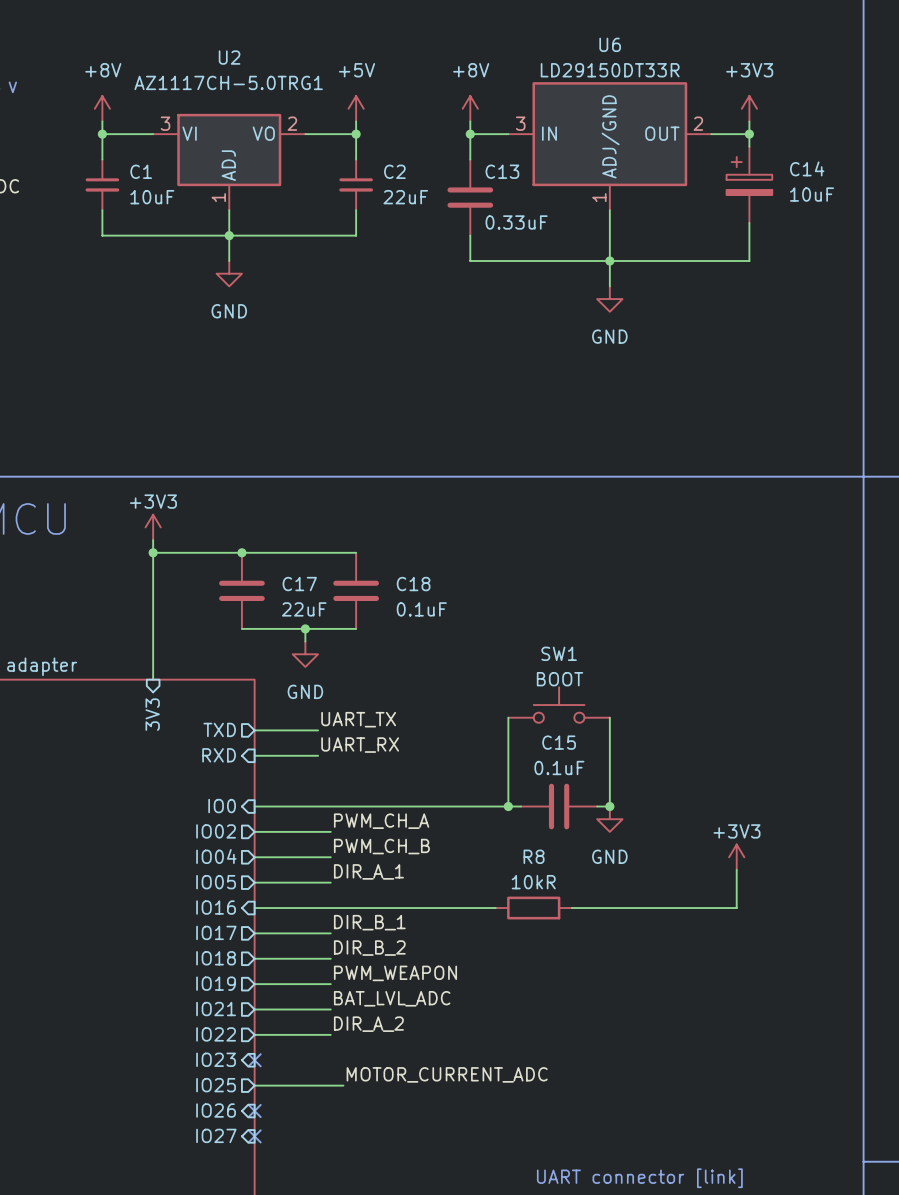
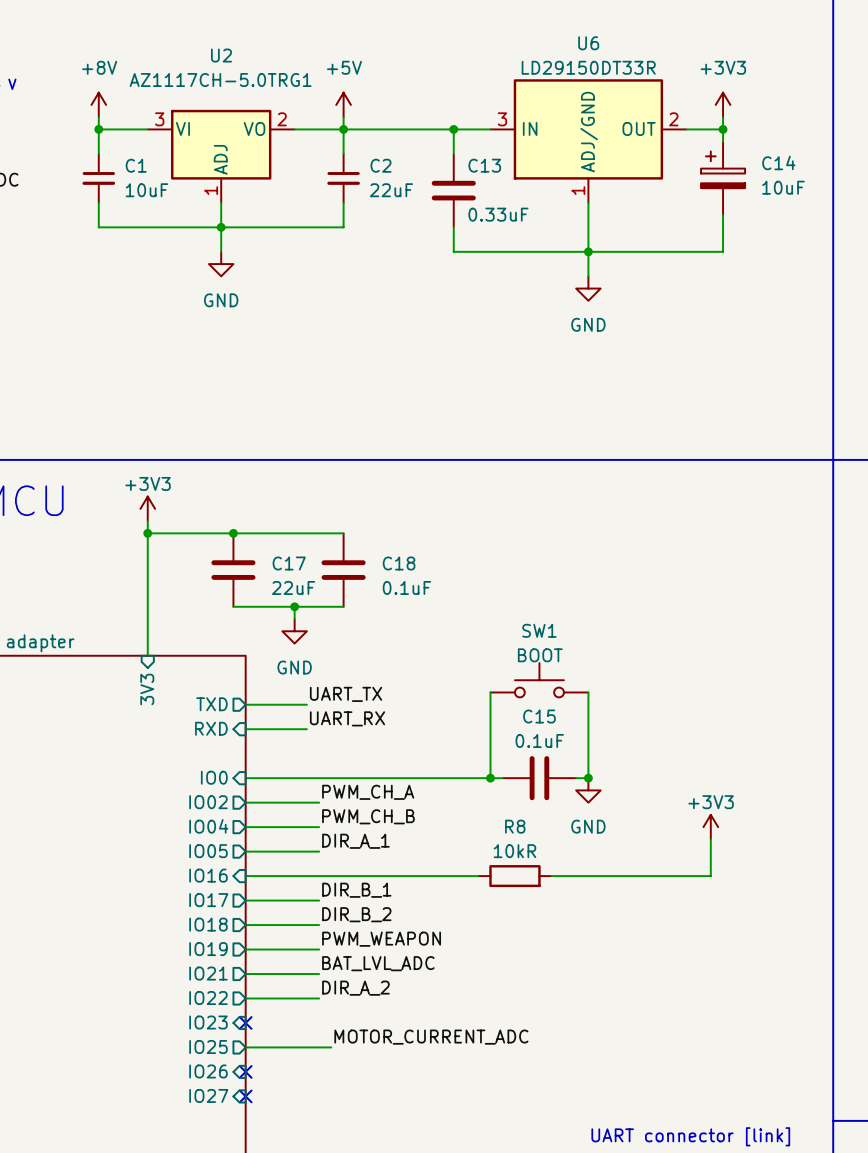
power symbol: +8V (470, 108) -> none
wire: (470, 121) (470, 134) -> (343, 129) (453, 129)
text position: UART connector [link] (639, 1178) -> UART connector [link] (690, 1136)

